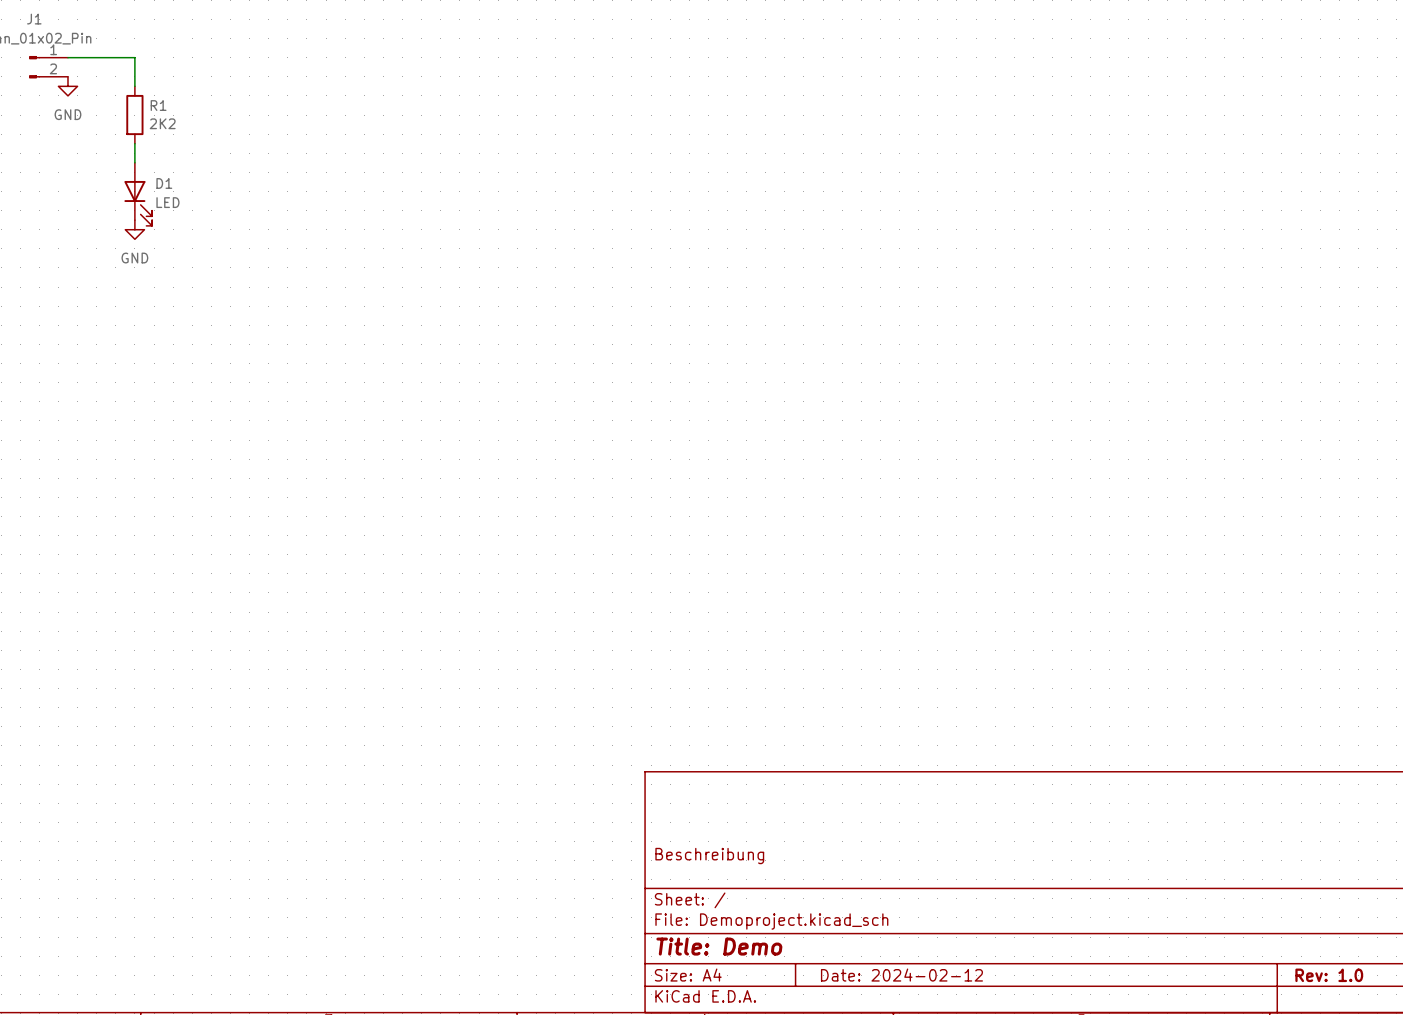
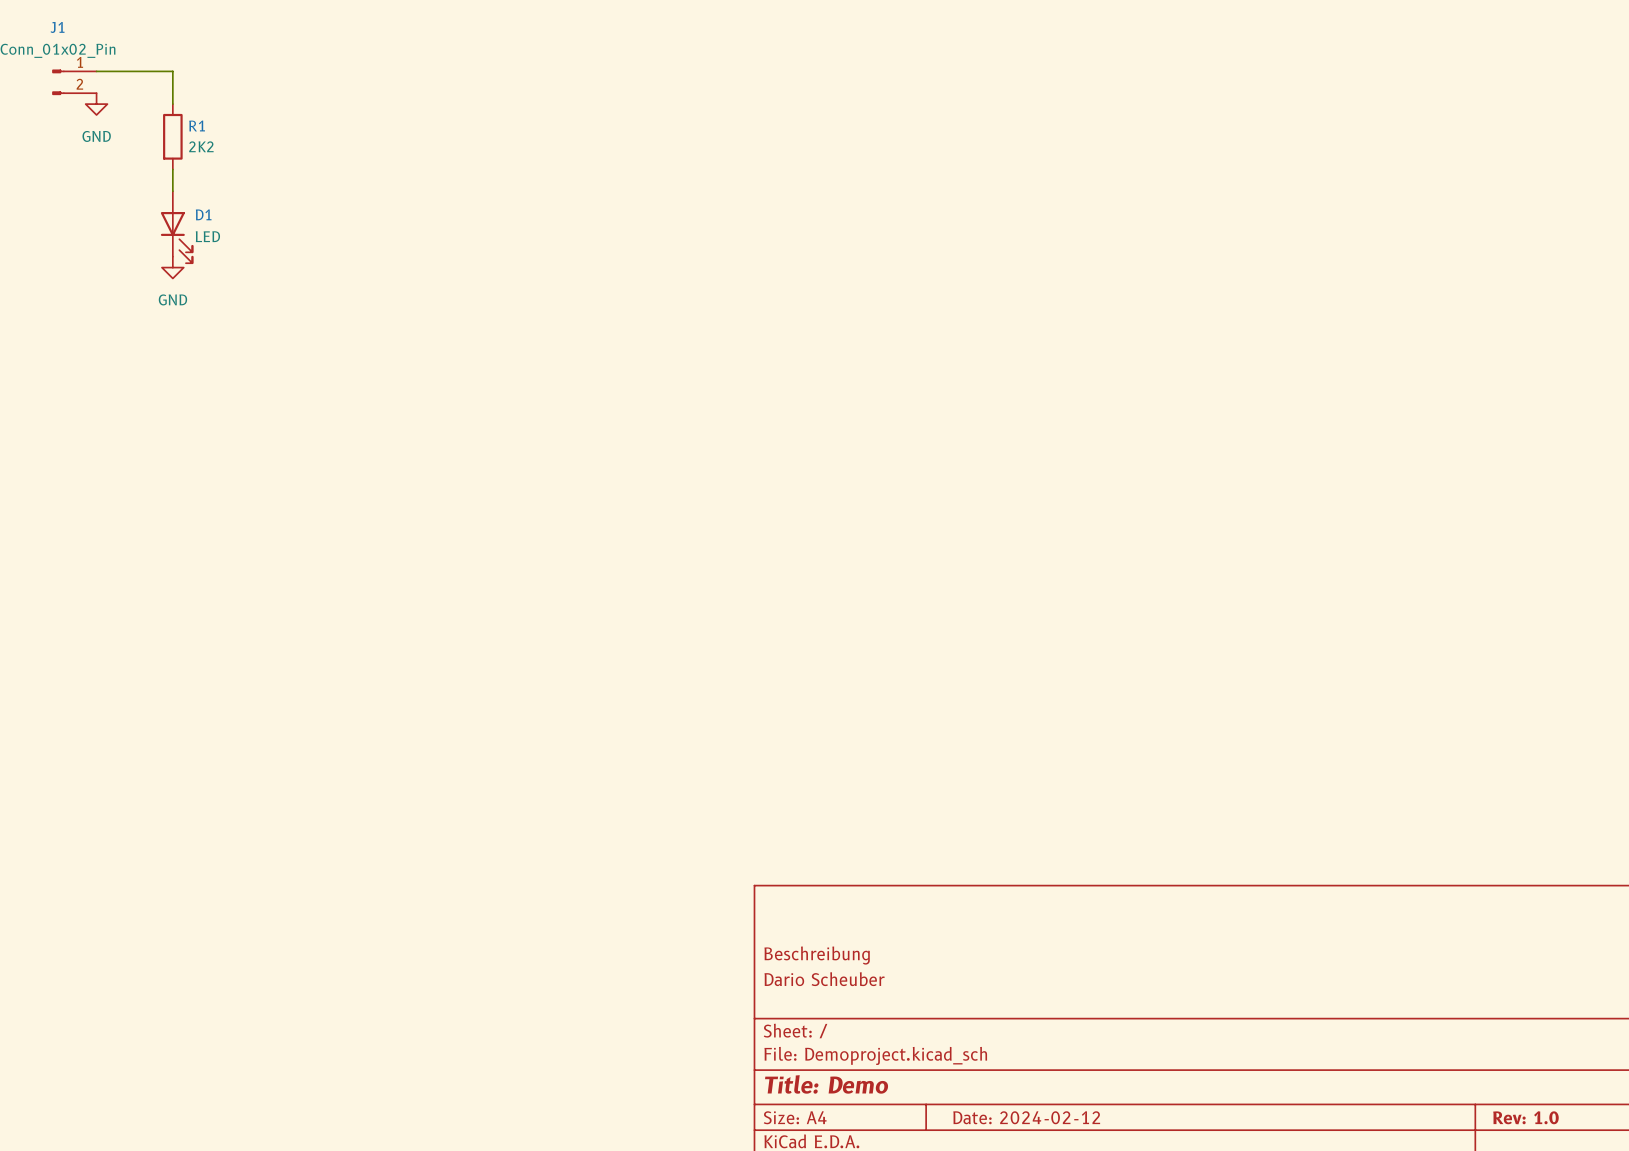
title block: none -> Beschreibung (817, 955)
title block: Beschreibung (709, 856) -> Dario Scheuber (824, 979)

